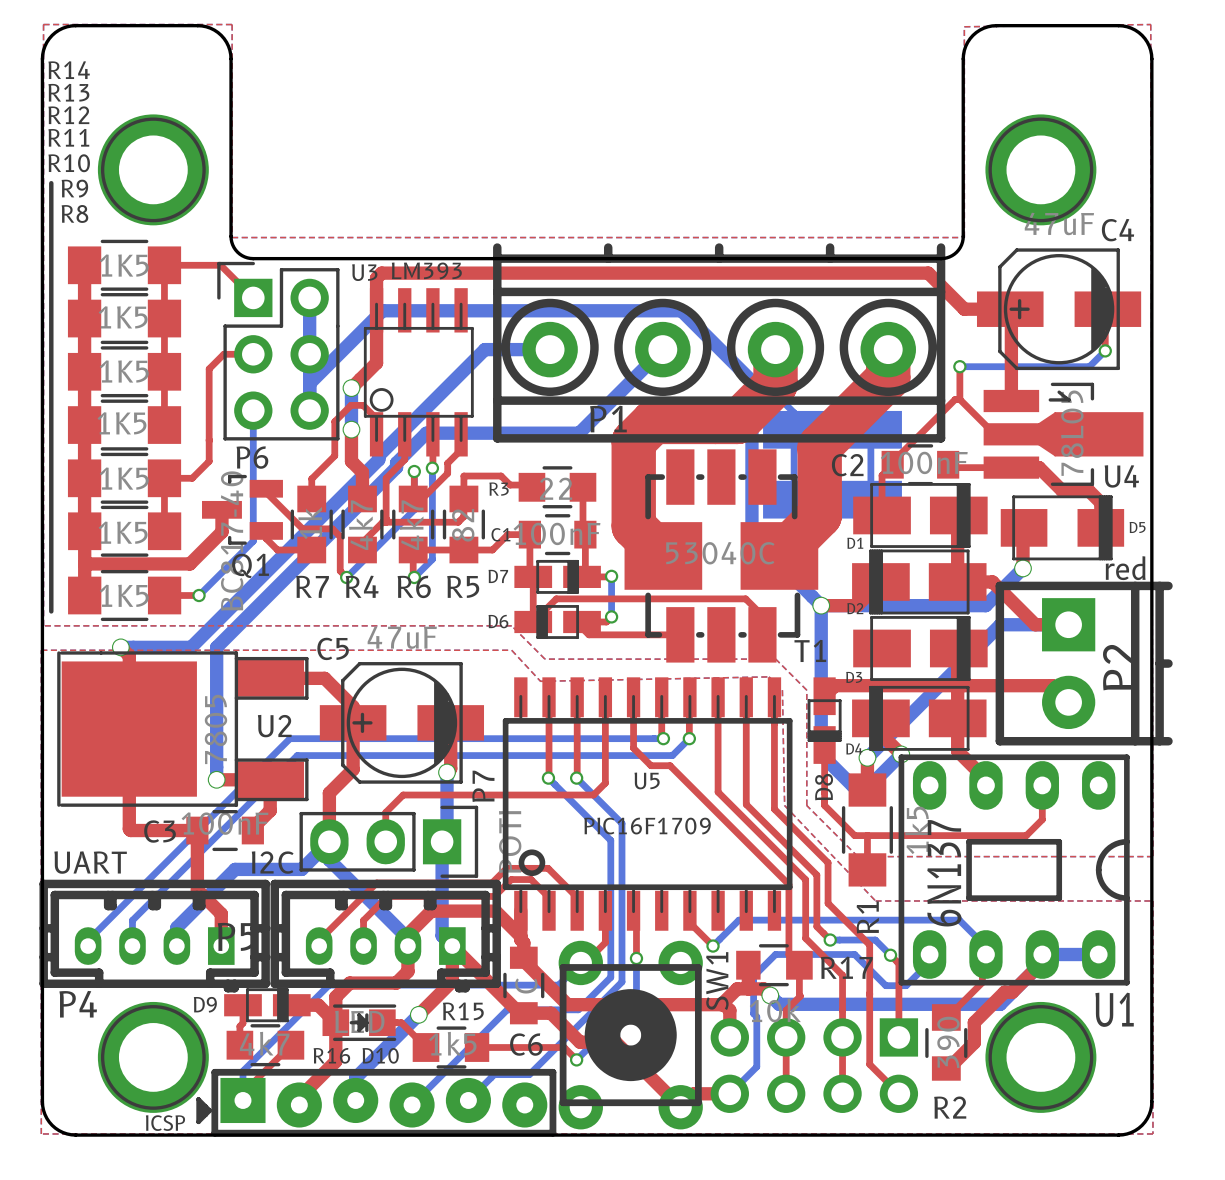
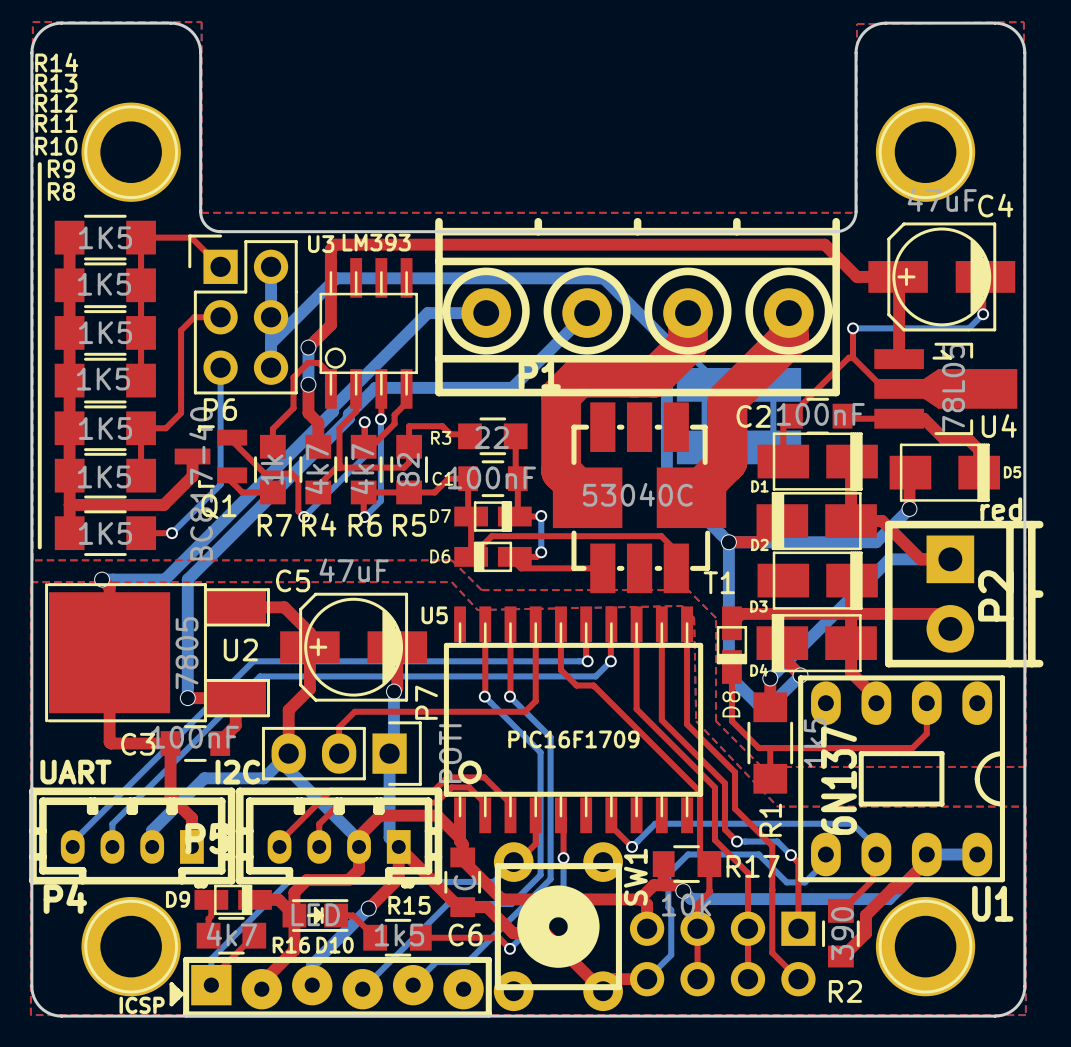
U5 name position: U5 (647, 780) -> U5 (434, 615)

